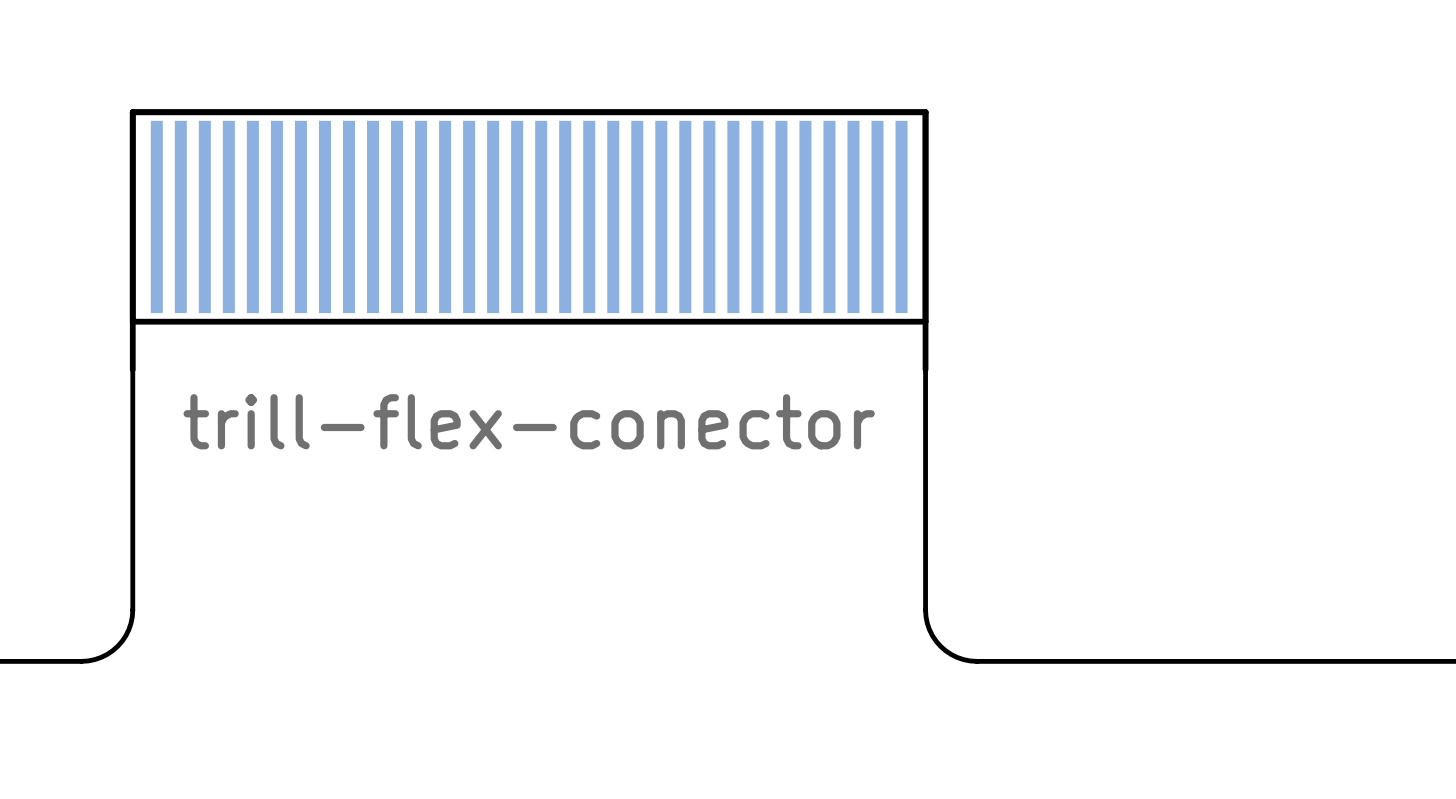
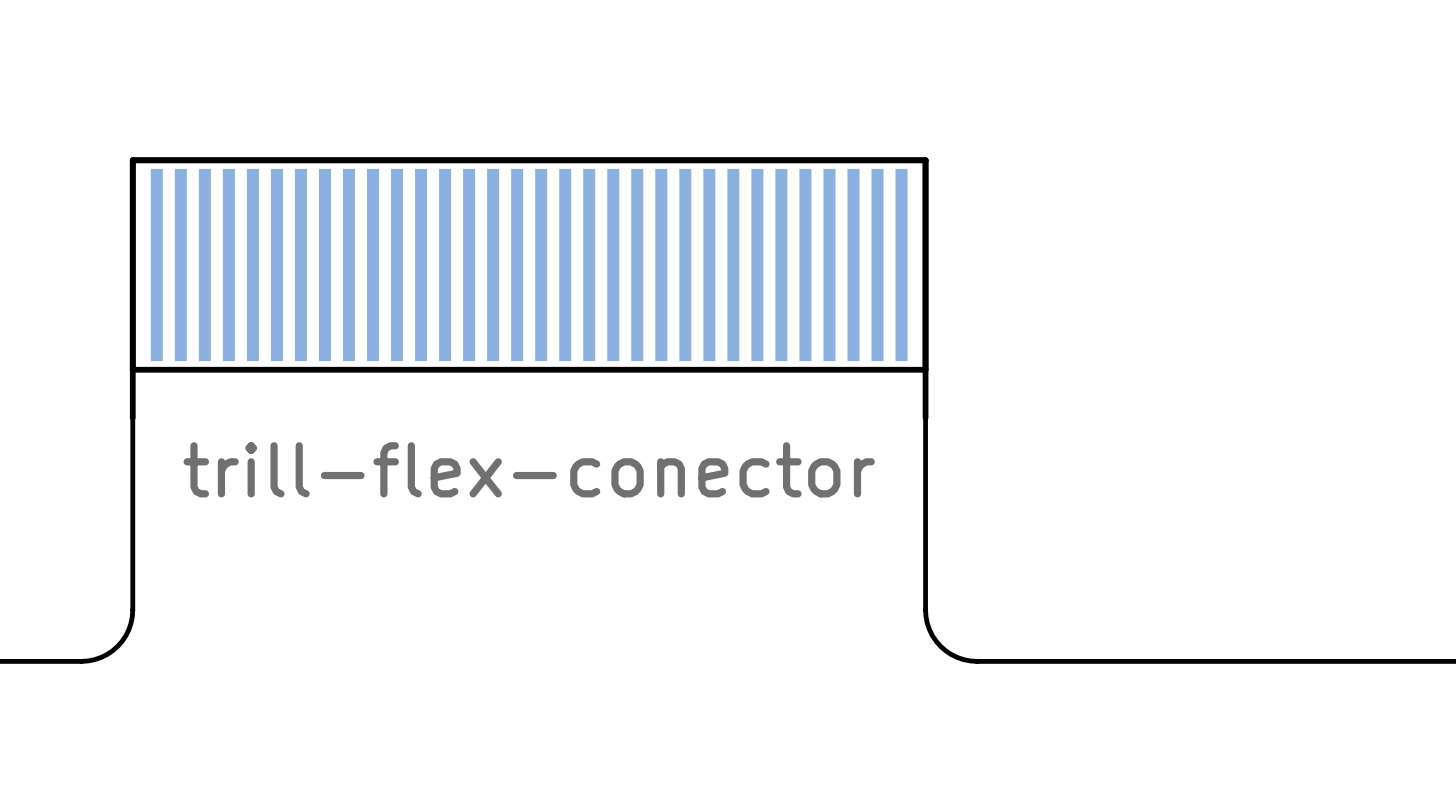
part position: (529, 240) -> (529, 289)
board edge: (132, 369) (132, 417) -> none
board edge: (925, 369) (925, 417) -> none

